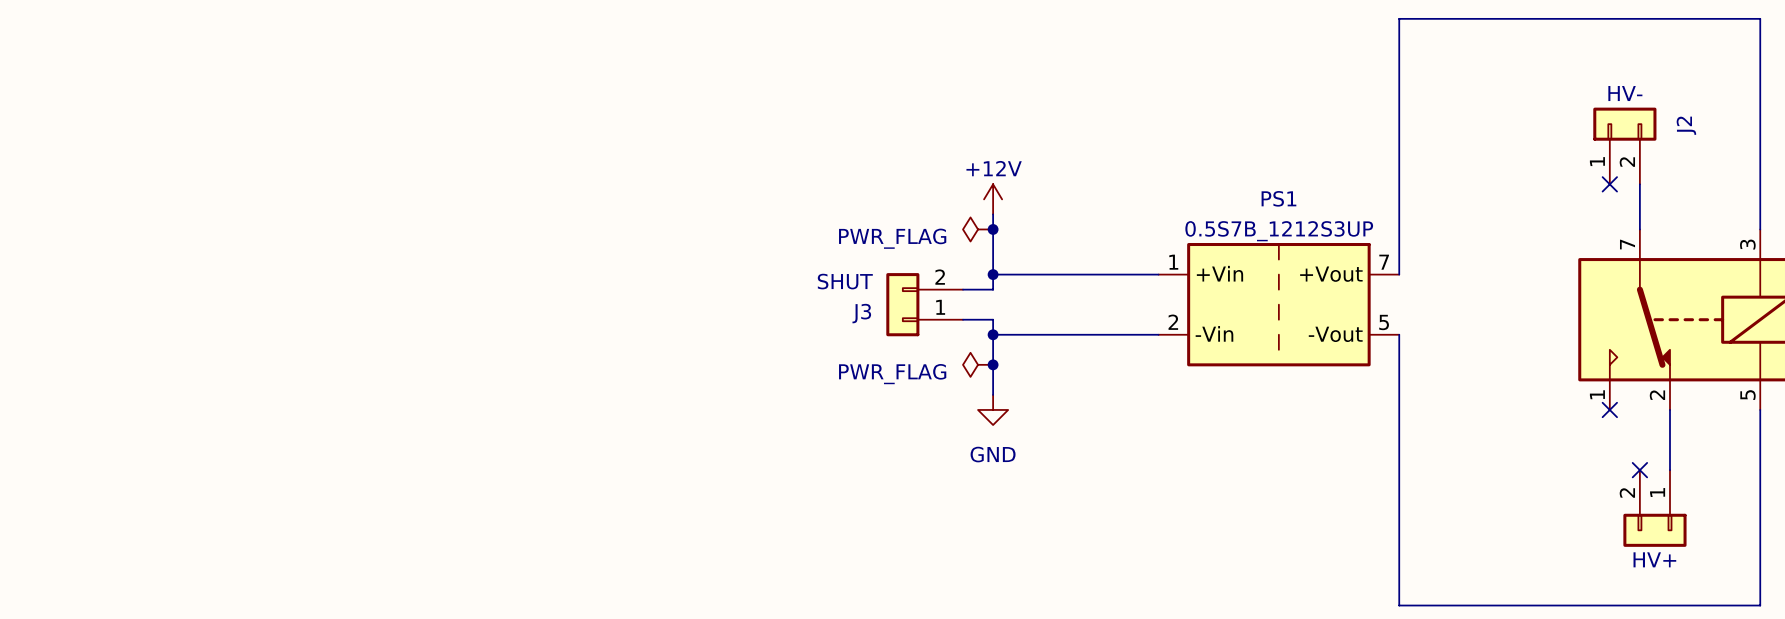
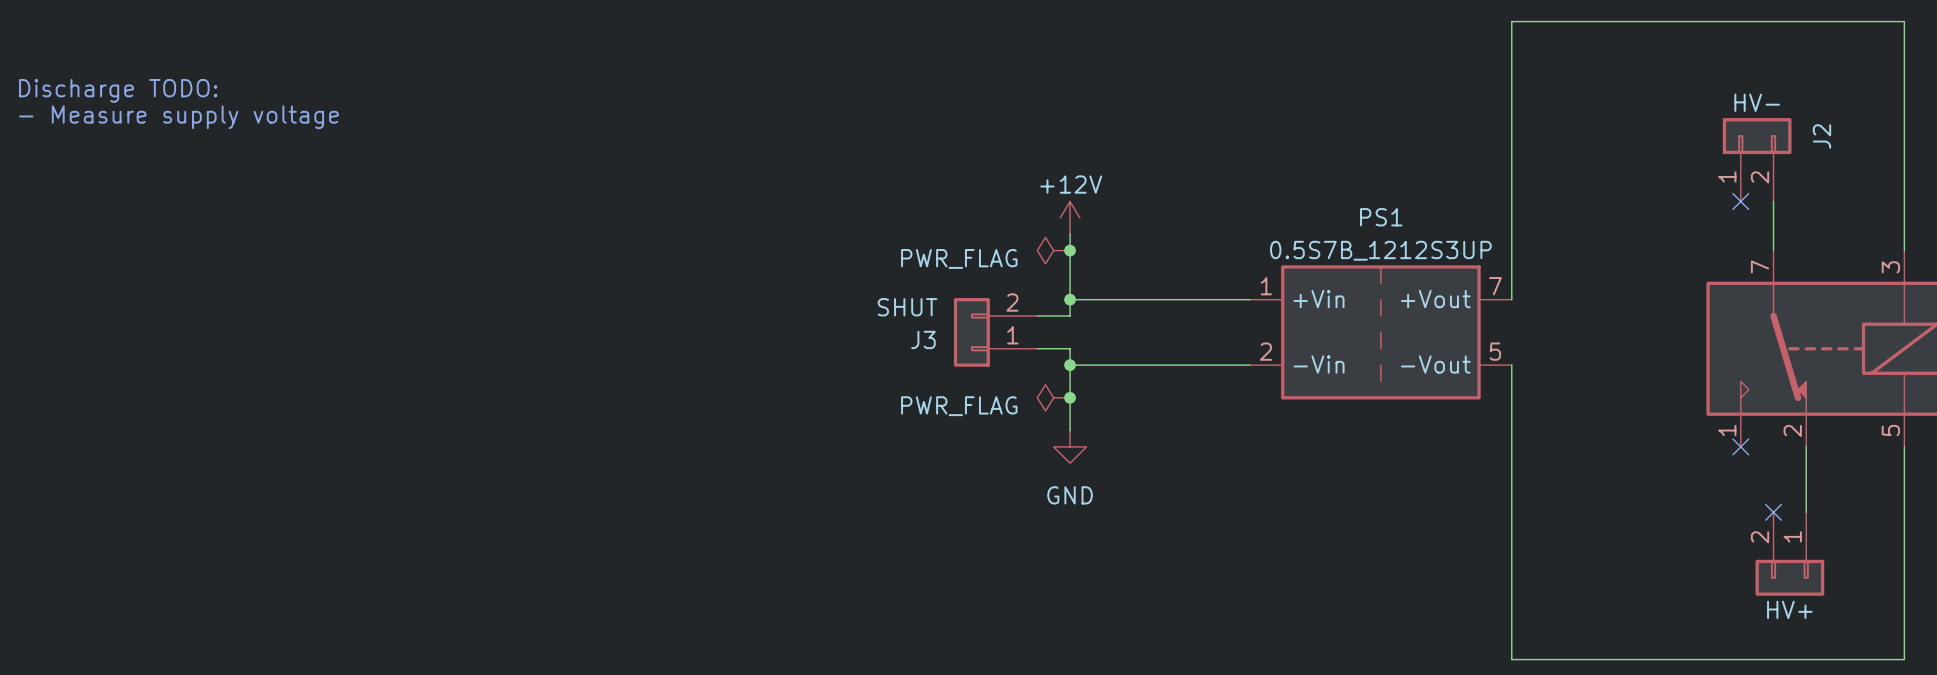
text: none -> Discharge TODO: (118, 90)
text: none -> - Measure supply voltage (178, 117)

